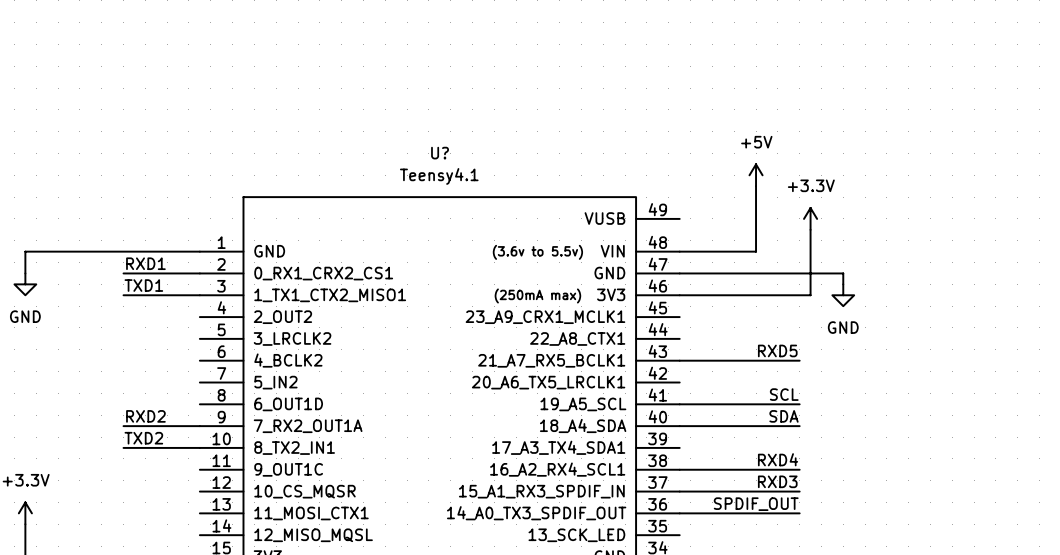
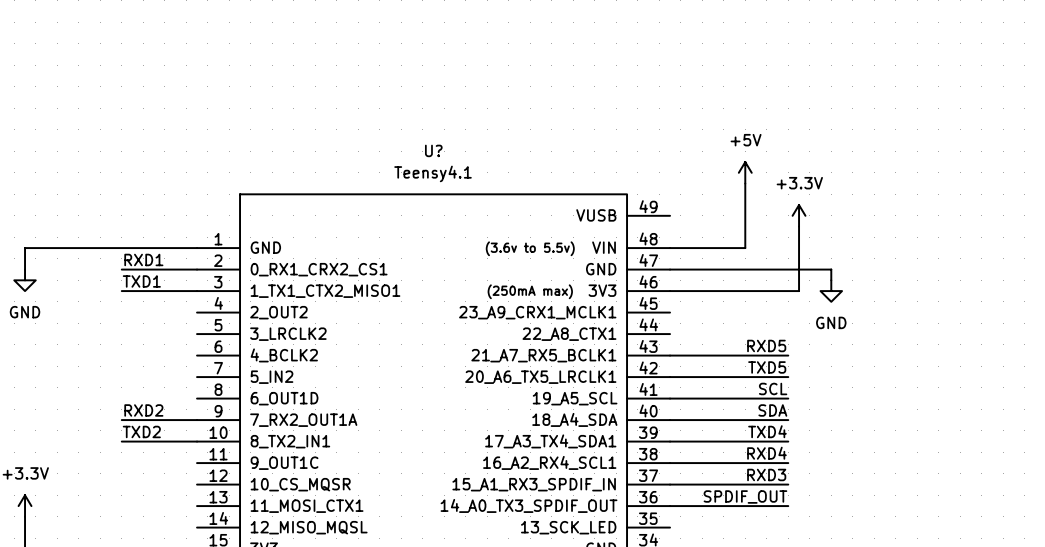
label: none -> TXD5 (767, 367)
wire: none -> (670, 377) (788, 377)
label: none -> TXD4 (767, 431)
wire: none -> (670, 441) (788, 441)

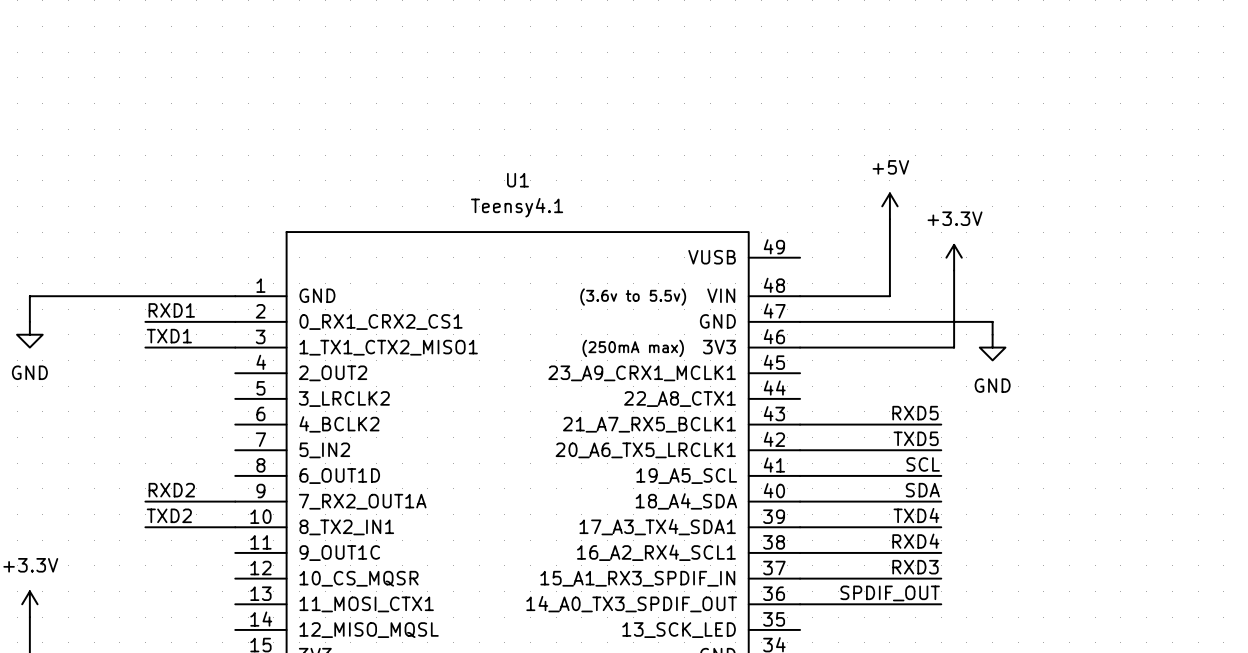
U? name: U? (433, 150) -> U1 (517, 180)

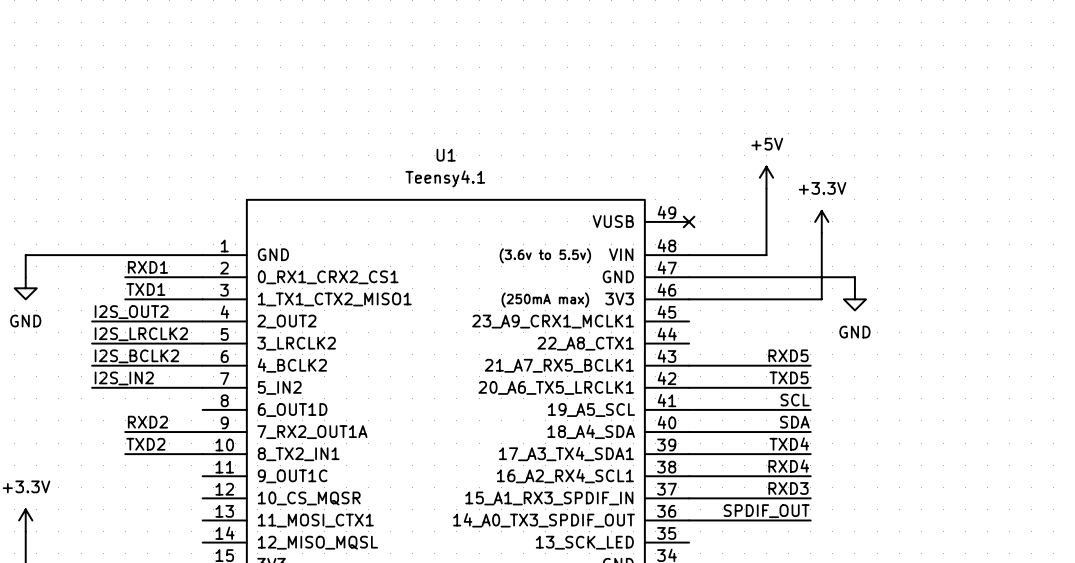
no-connect mark: none -> (689, 221)
label: none -> I2S_OUT2 (131, 312)
wire: none -> (92, 321) (202, 321)
label: none -> I2S_LRCLK2 (141, 334)
wire: none -> (92, 343) (202, 343)
label: none -> I2S_BCLK2 (136, 356)
wire: none -> (92, 365) (202, 365)
label: none -> I2S_IN2 (124, 378)
wire: none -> (92, 387) (202, 387)

